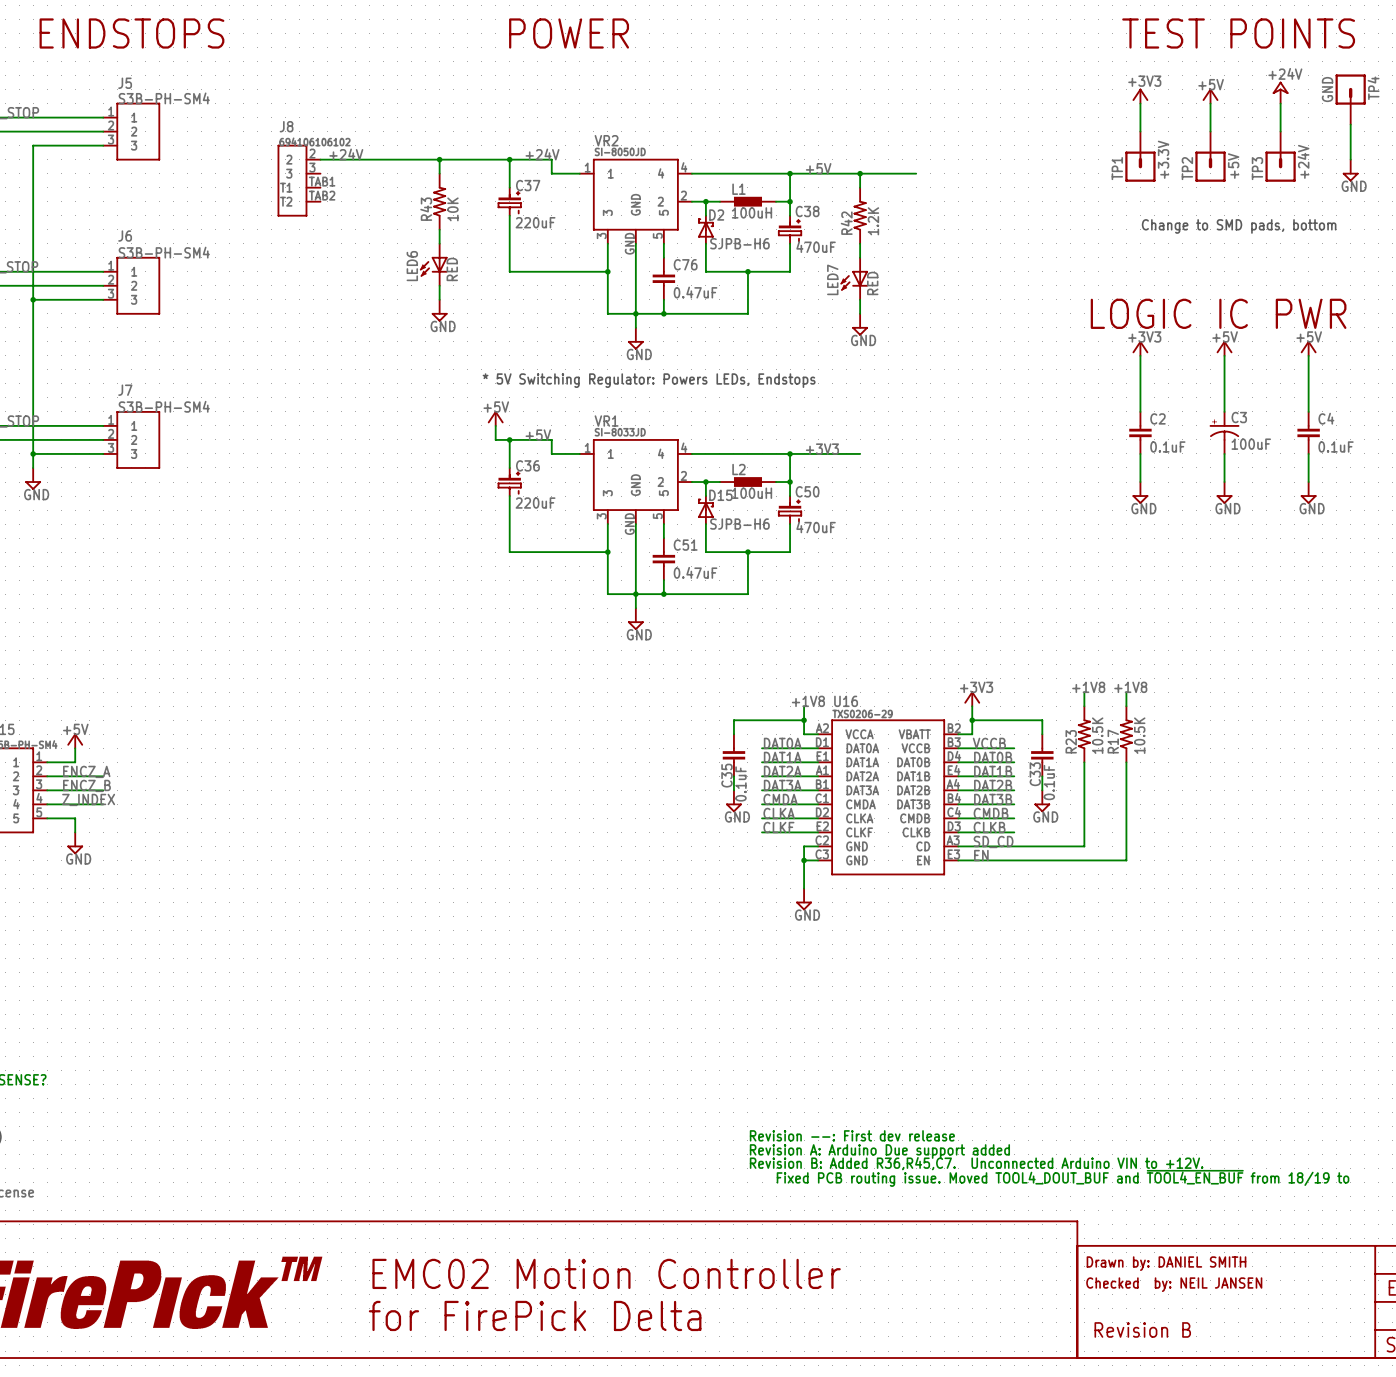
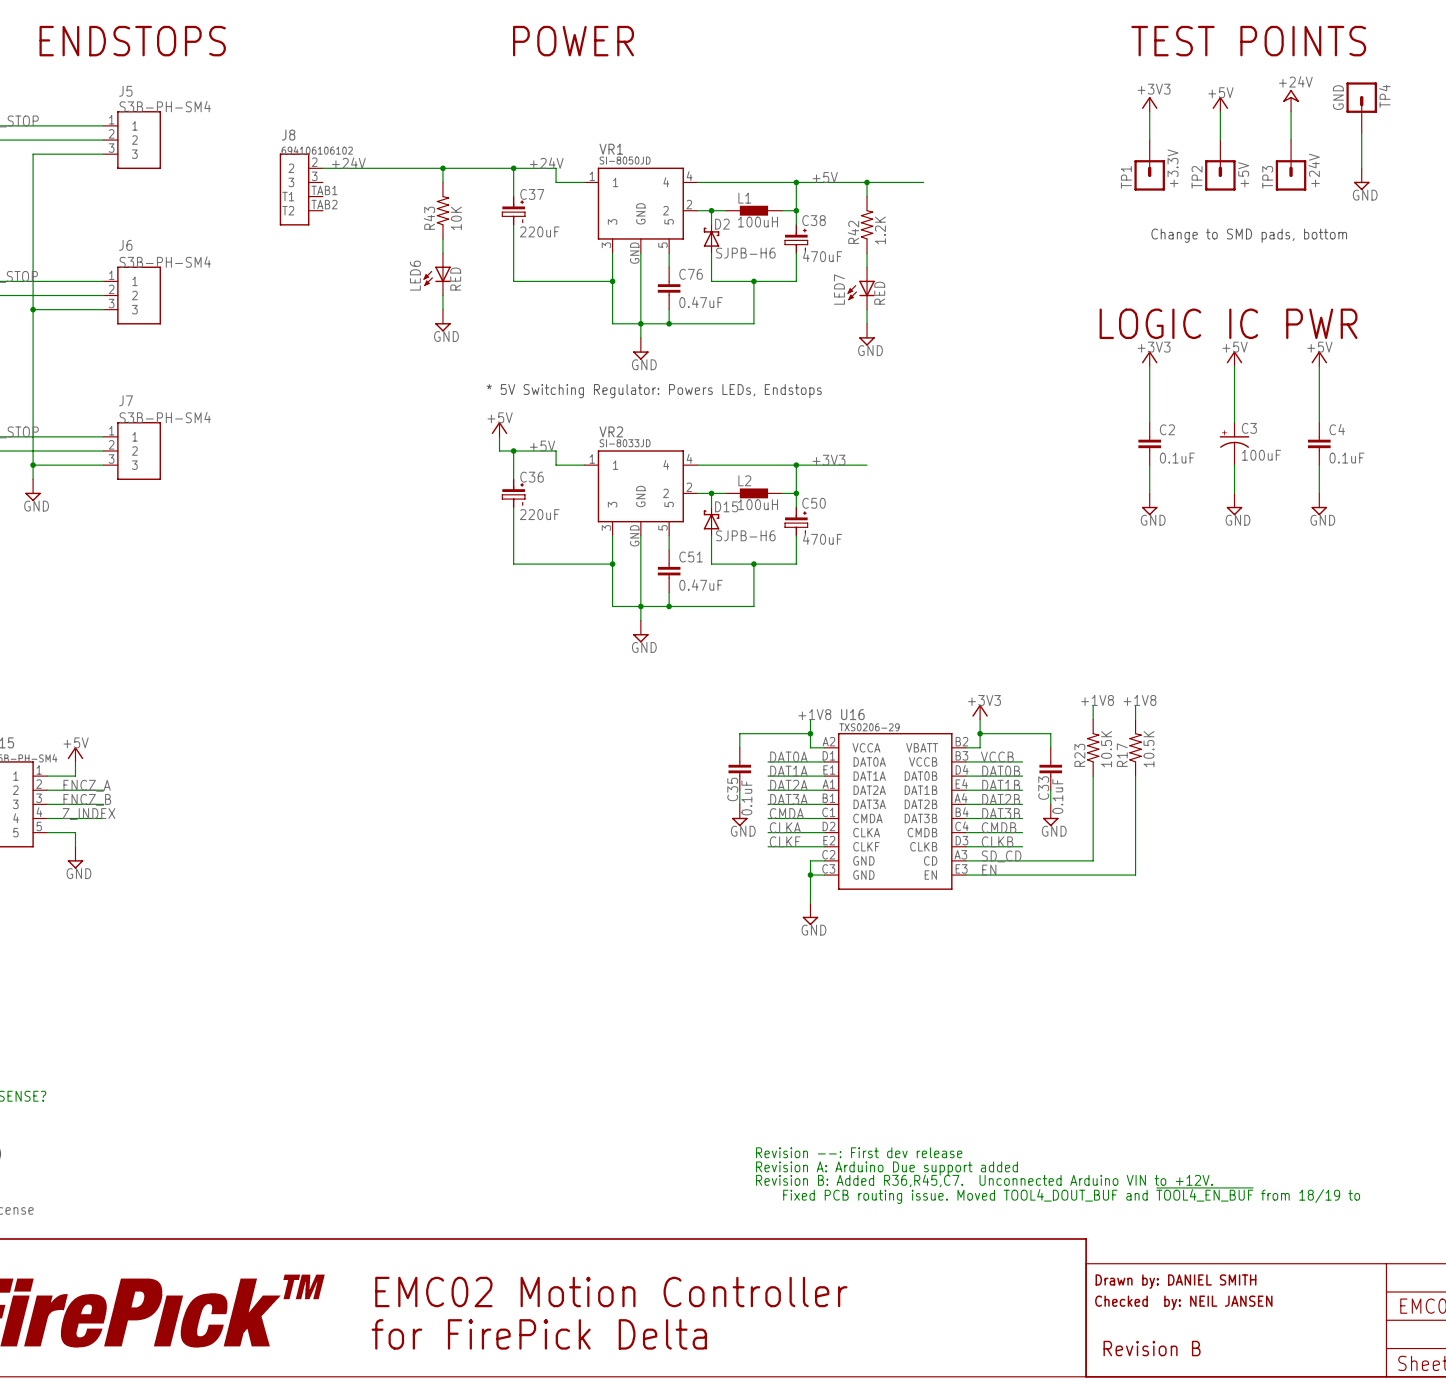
VR2 name: VR2 (606, 140) -> VR1 (611, 149)
VR1 name: VR1 (606, 421) -> VR2 (611, 431)

